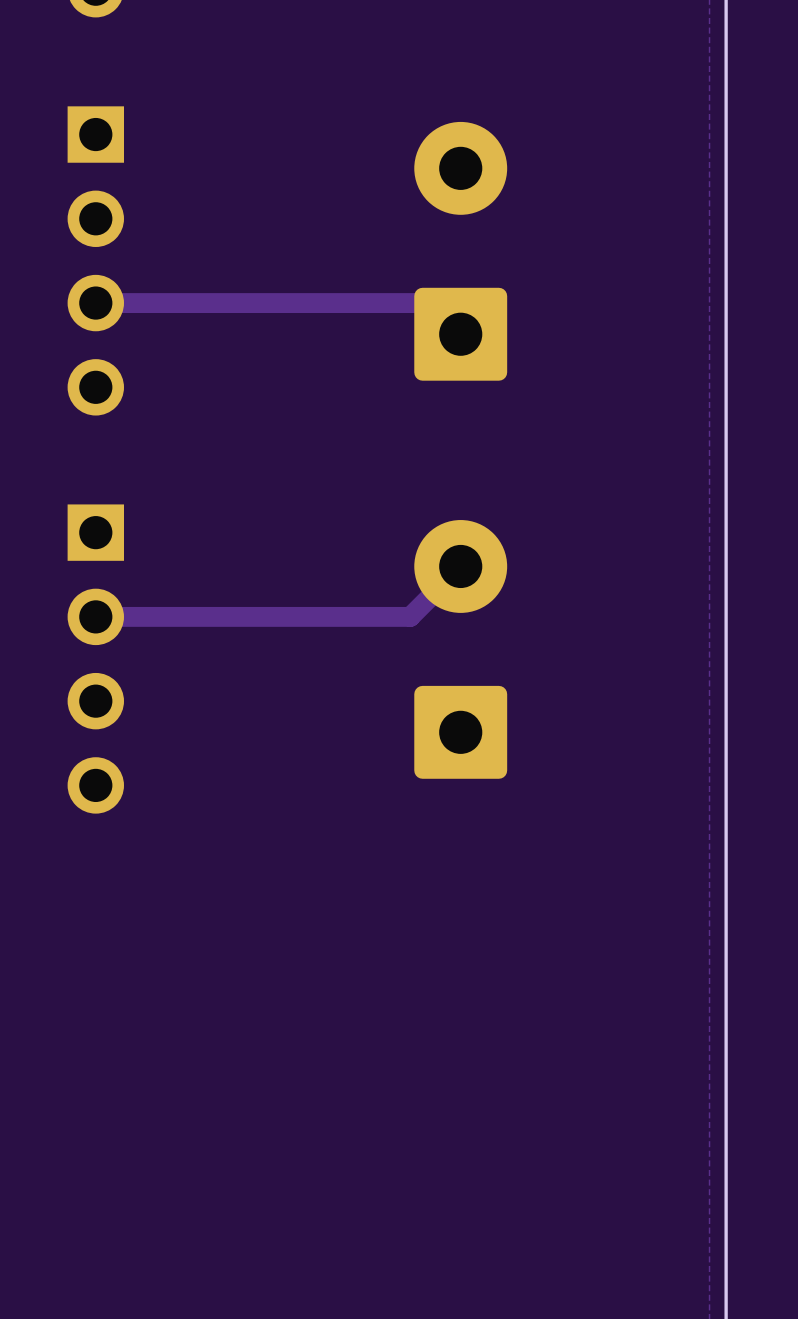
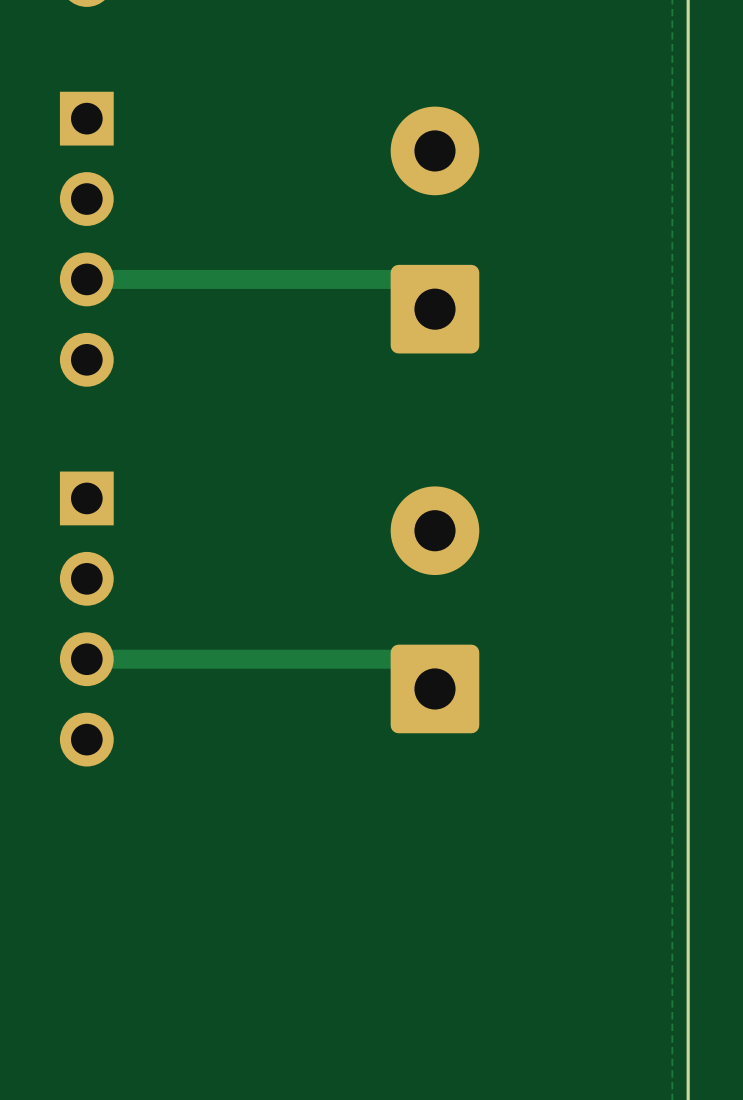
track: (460, 566) (410, 616) (95, 616) -> none
track: none -> (86, 659) (405, 659) (434, 688)

